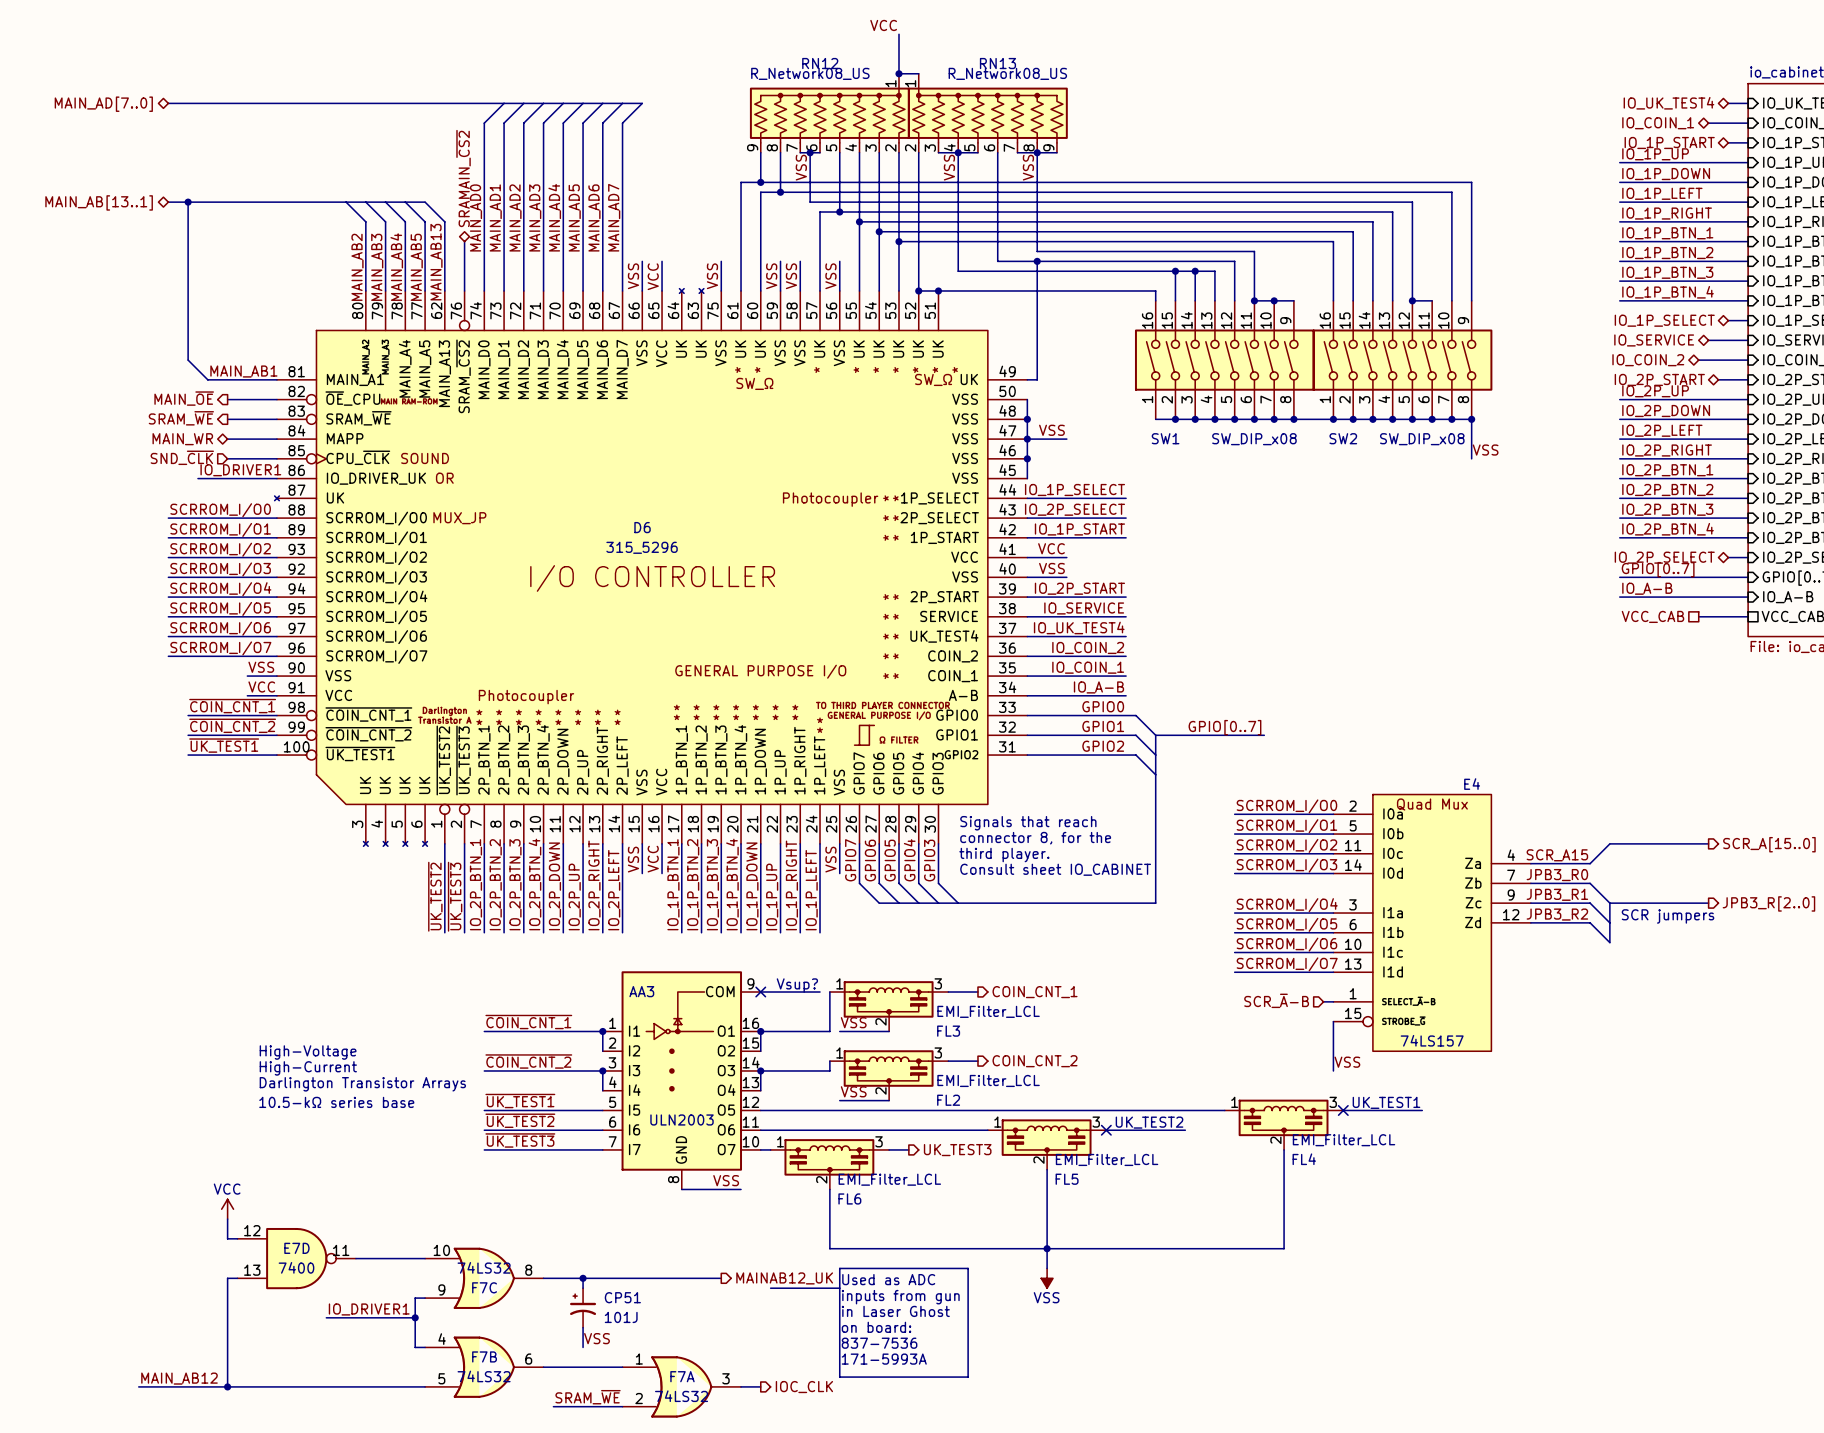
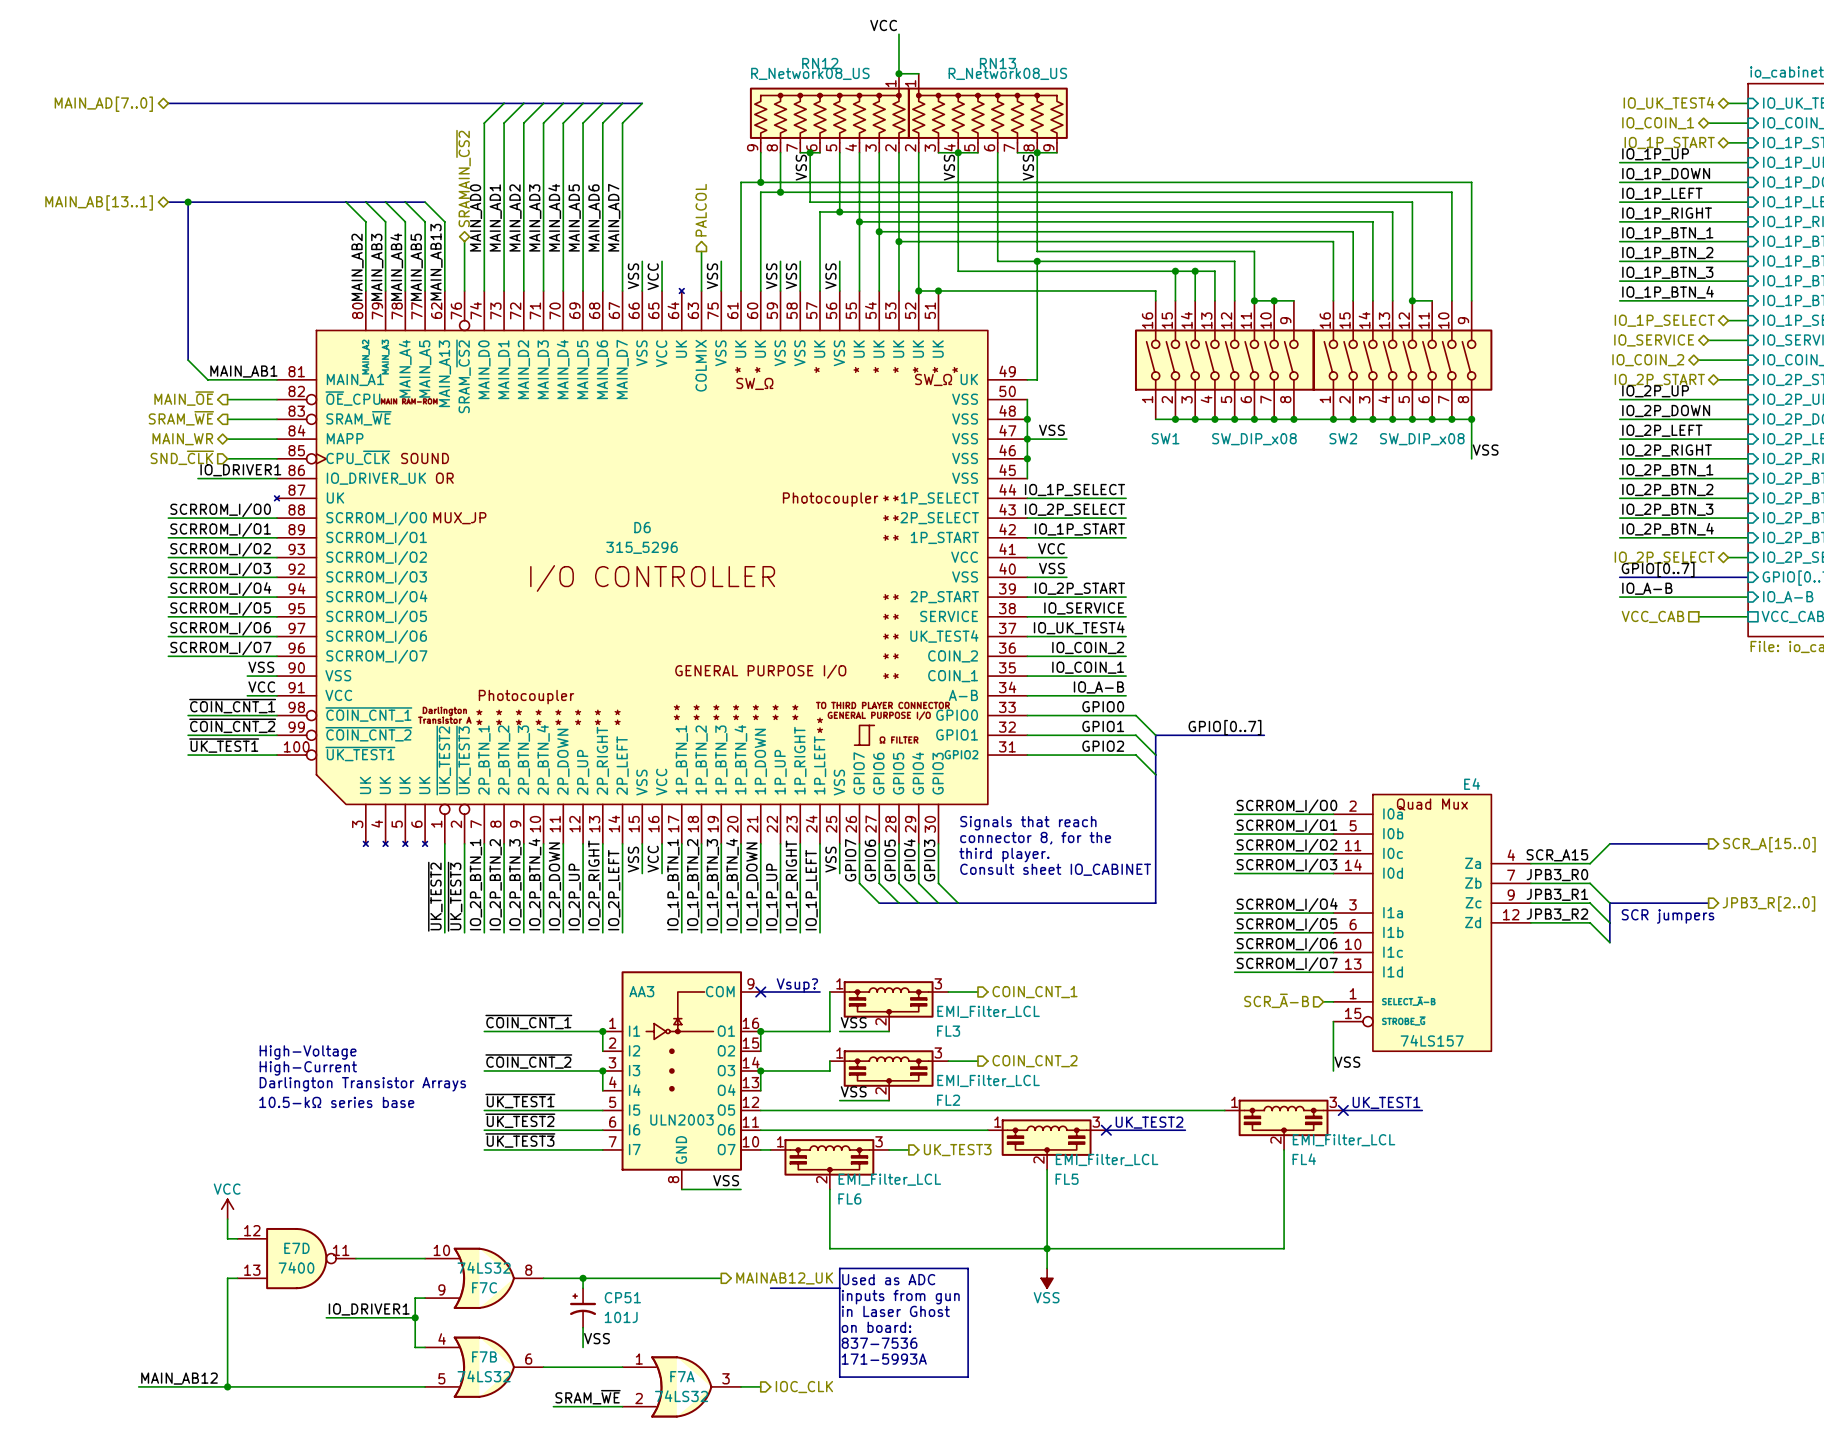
hierarchical label: none -> PALCOL (701, 210)
wire: none -> (701, 251) (701, 290)
D6 symbol: [274, 288, 1028, 847] -> [274, 288, 1028, 847]

